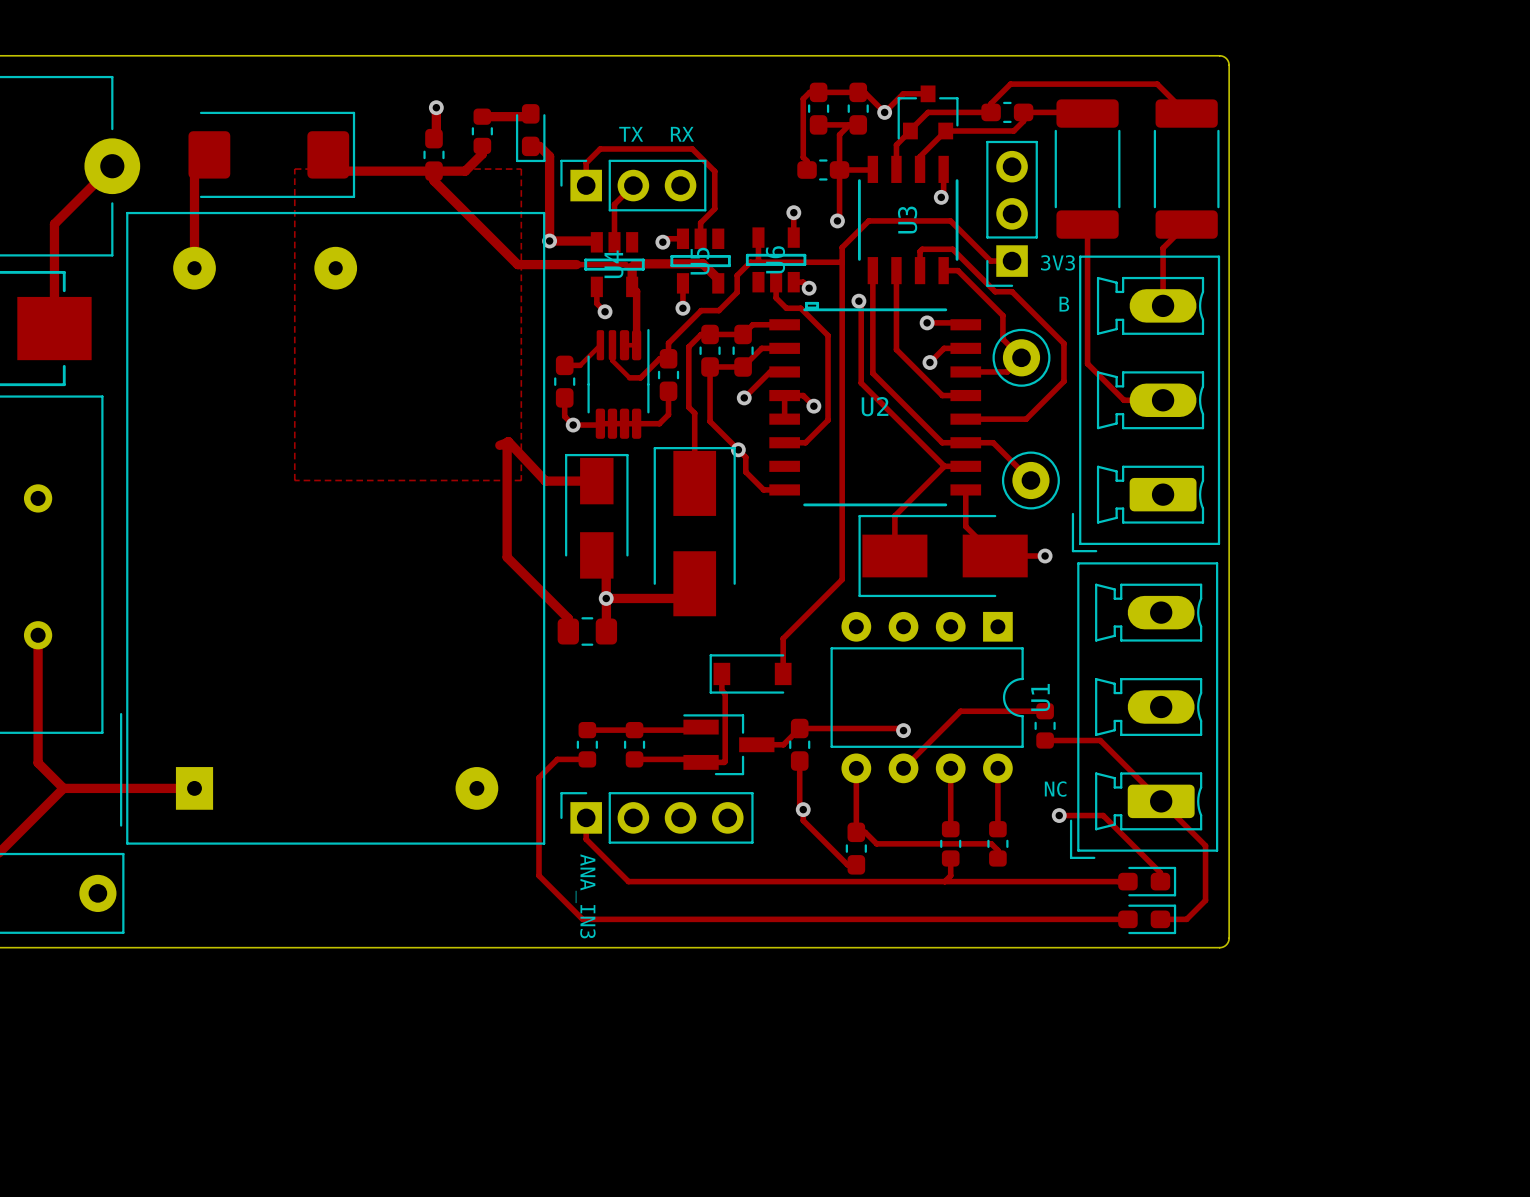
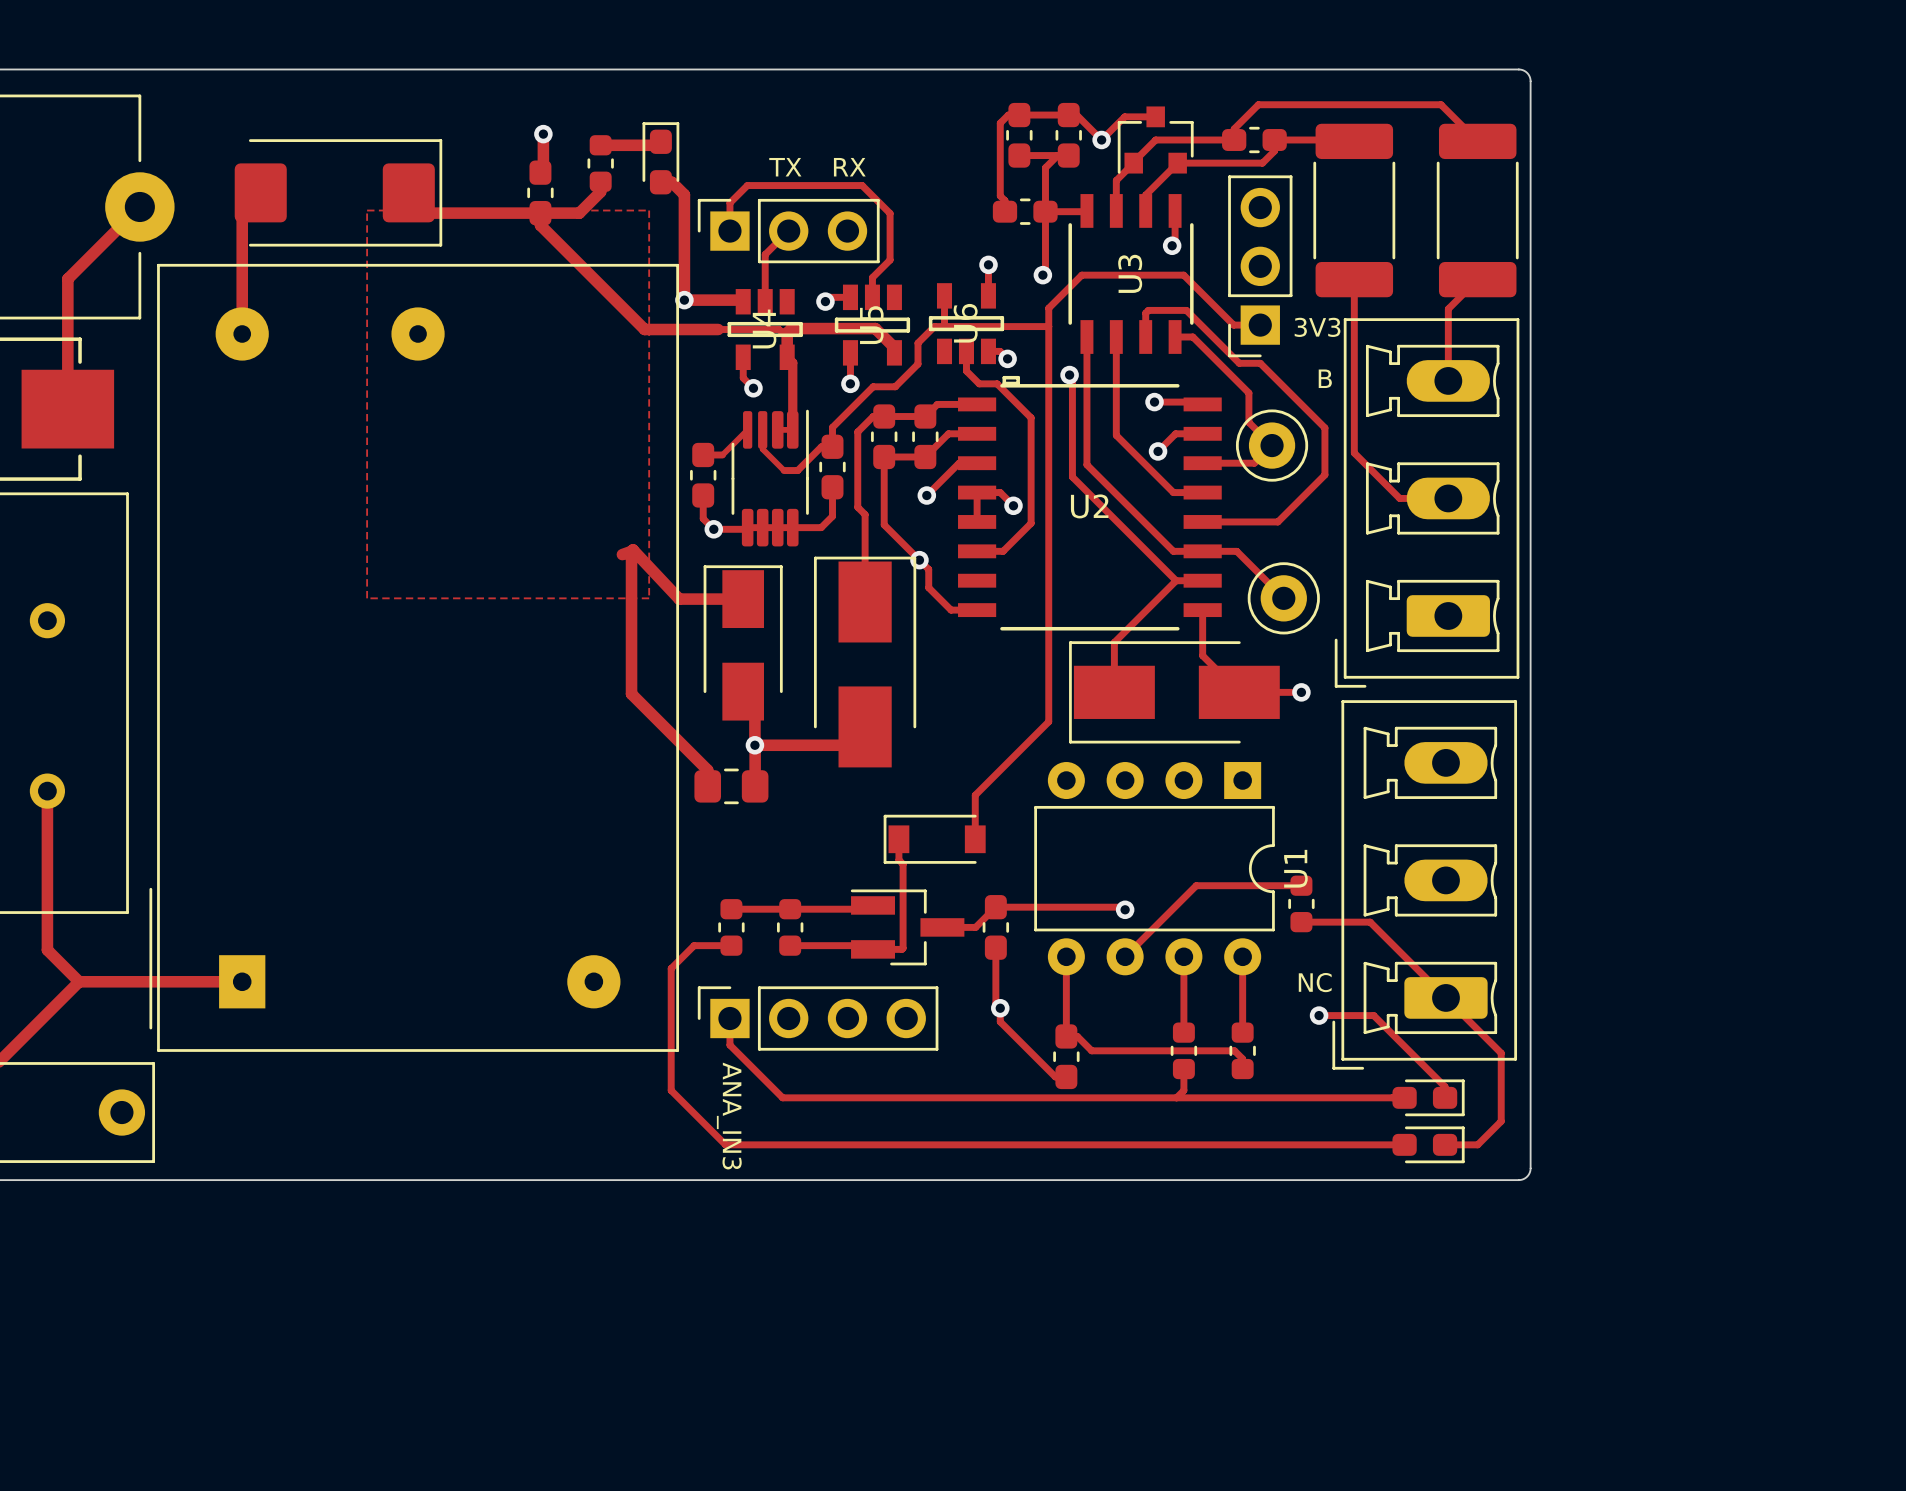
part rotation: 0° (530, 133) -> 180° (660, 158)

